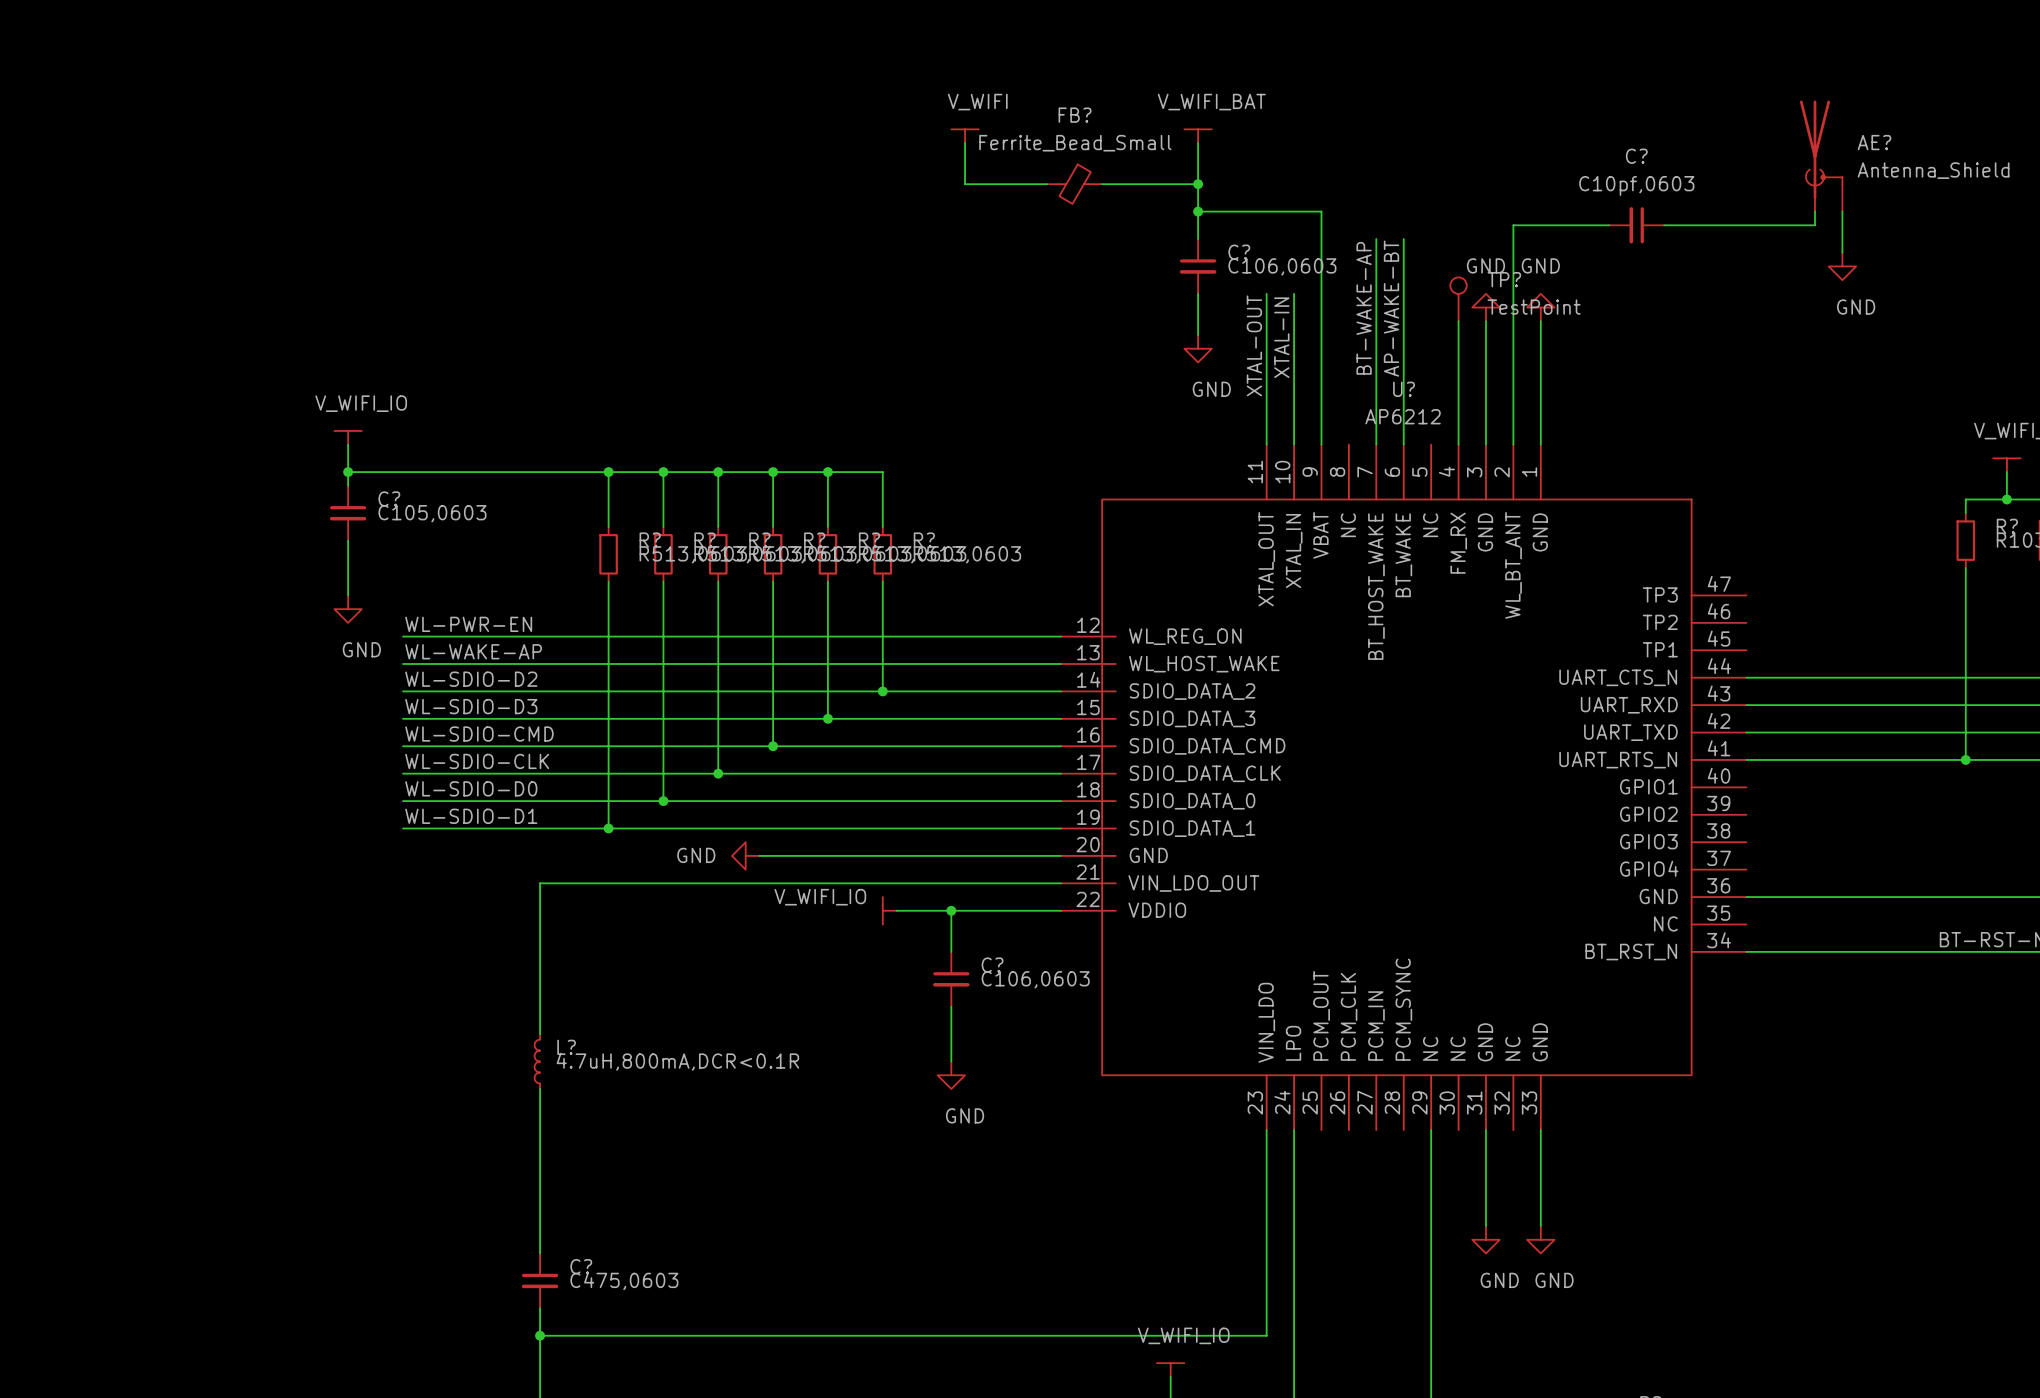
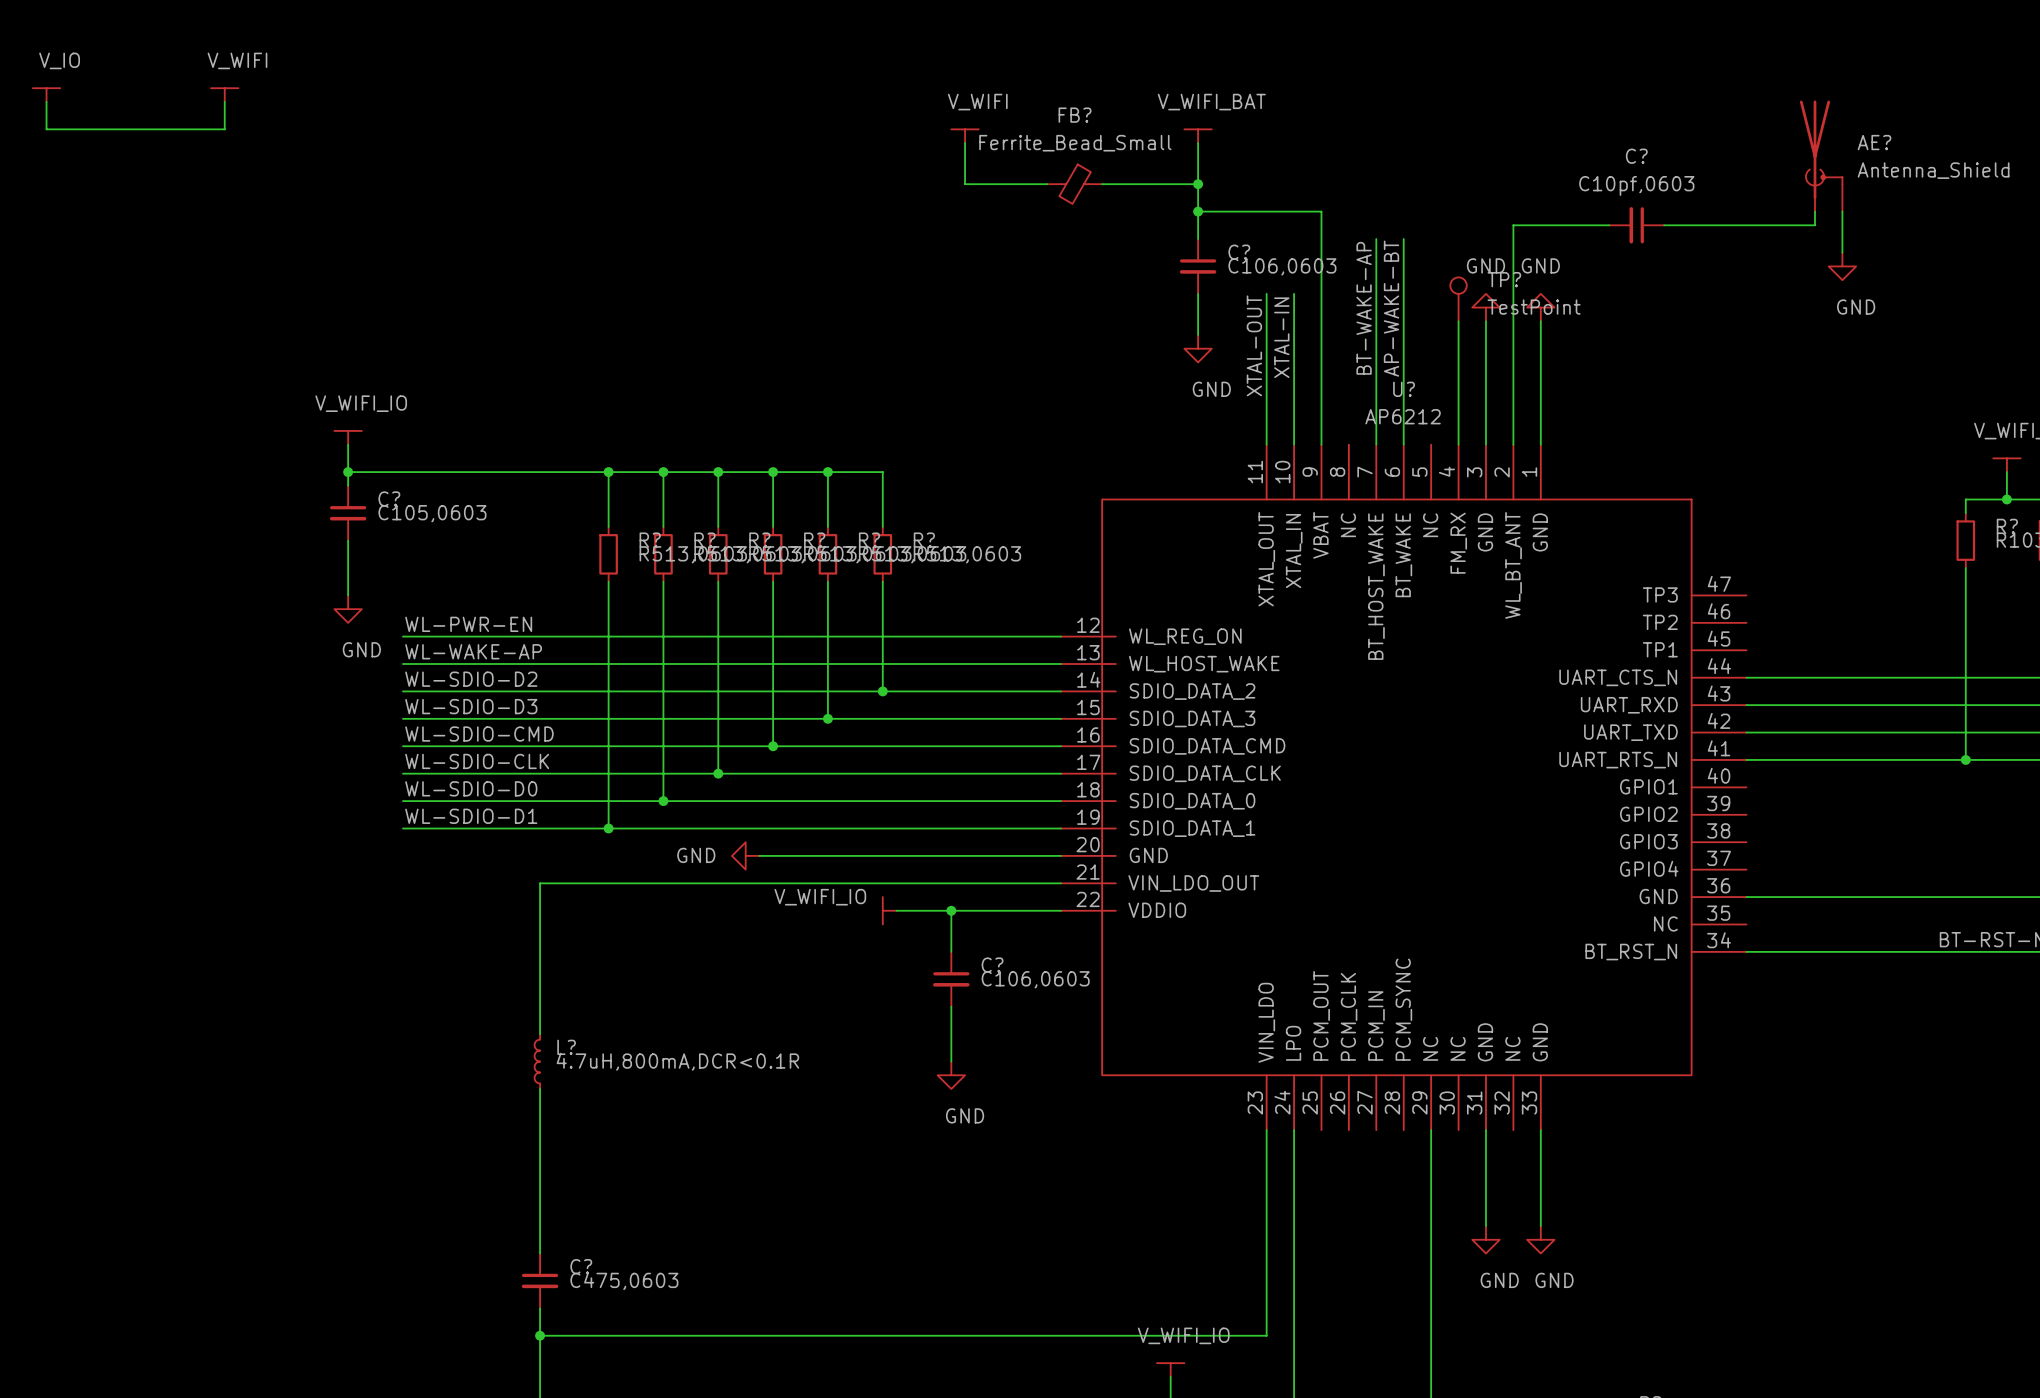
power symbol: none -> V_IO (46, 95)
power symbol: none -> V_WIFI (224, 95)
wire: none -> (46, 101) (46, 129) (224, 129) (224, 101)

